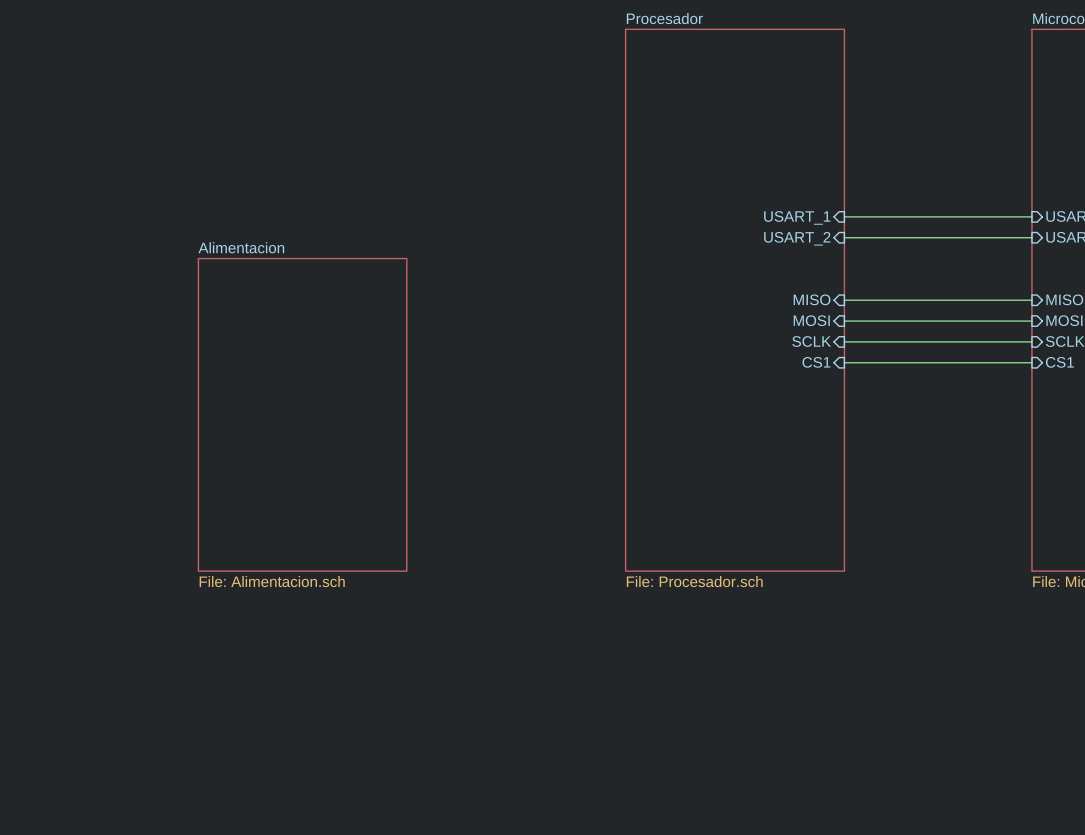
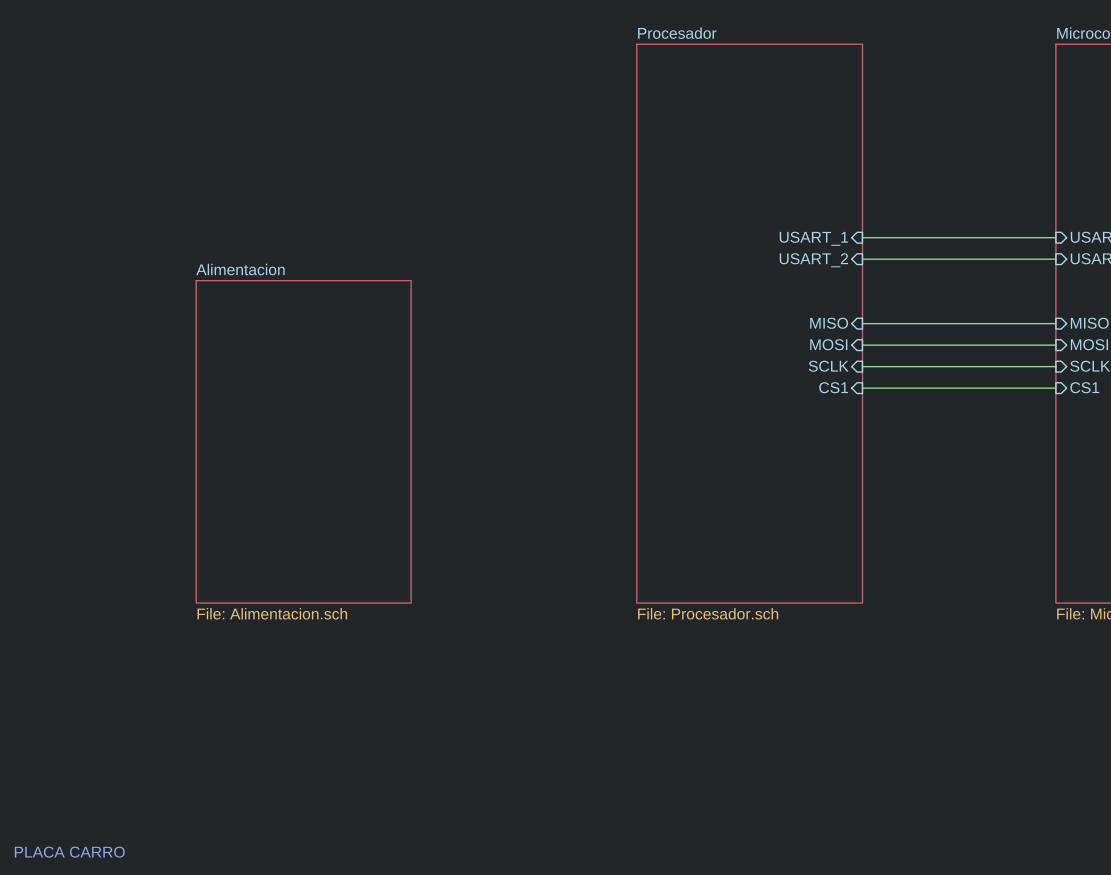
text: none -> PLACA CARRO (69, 852)

